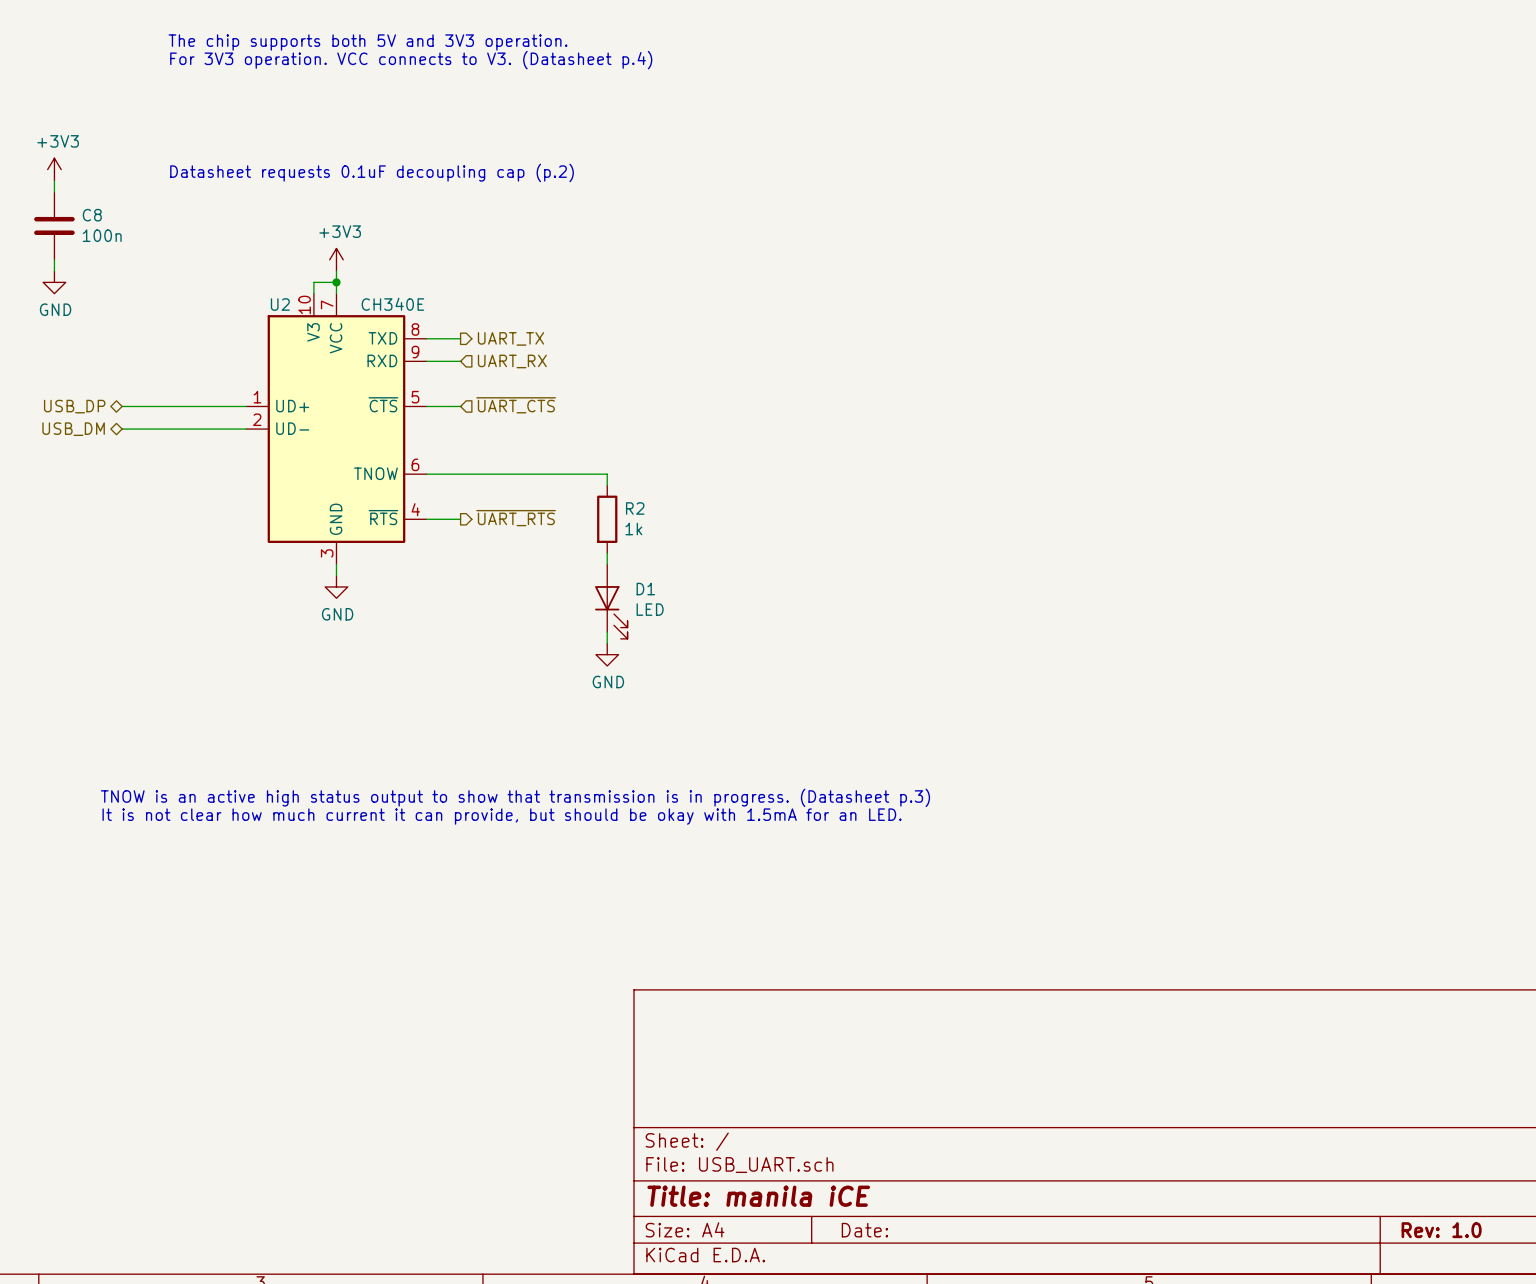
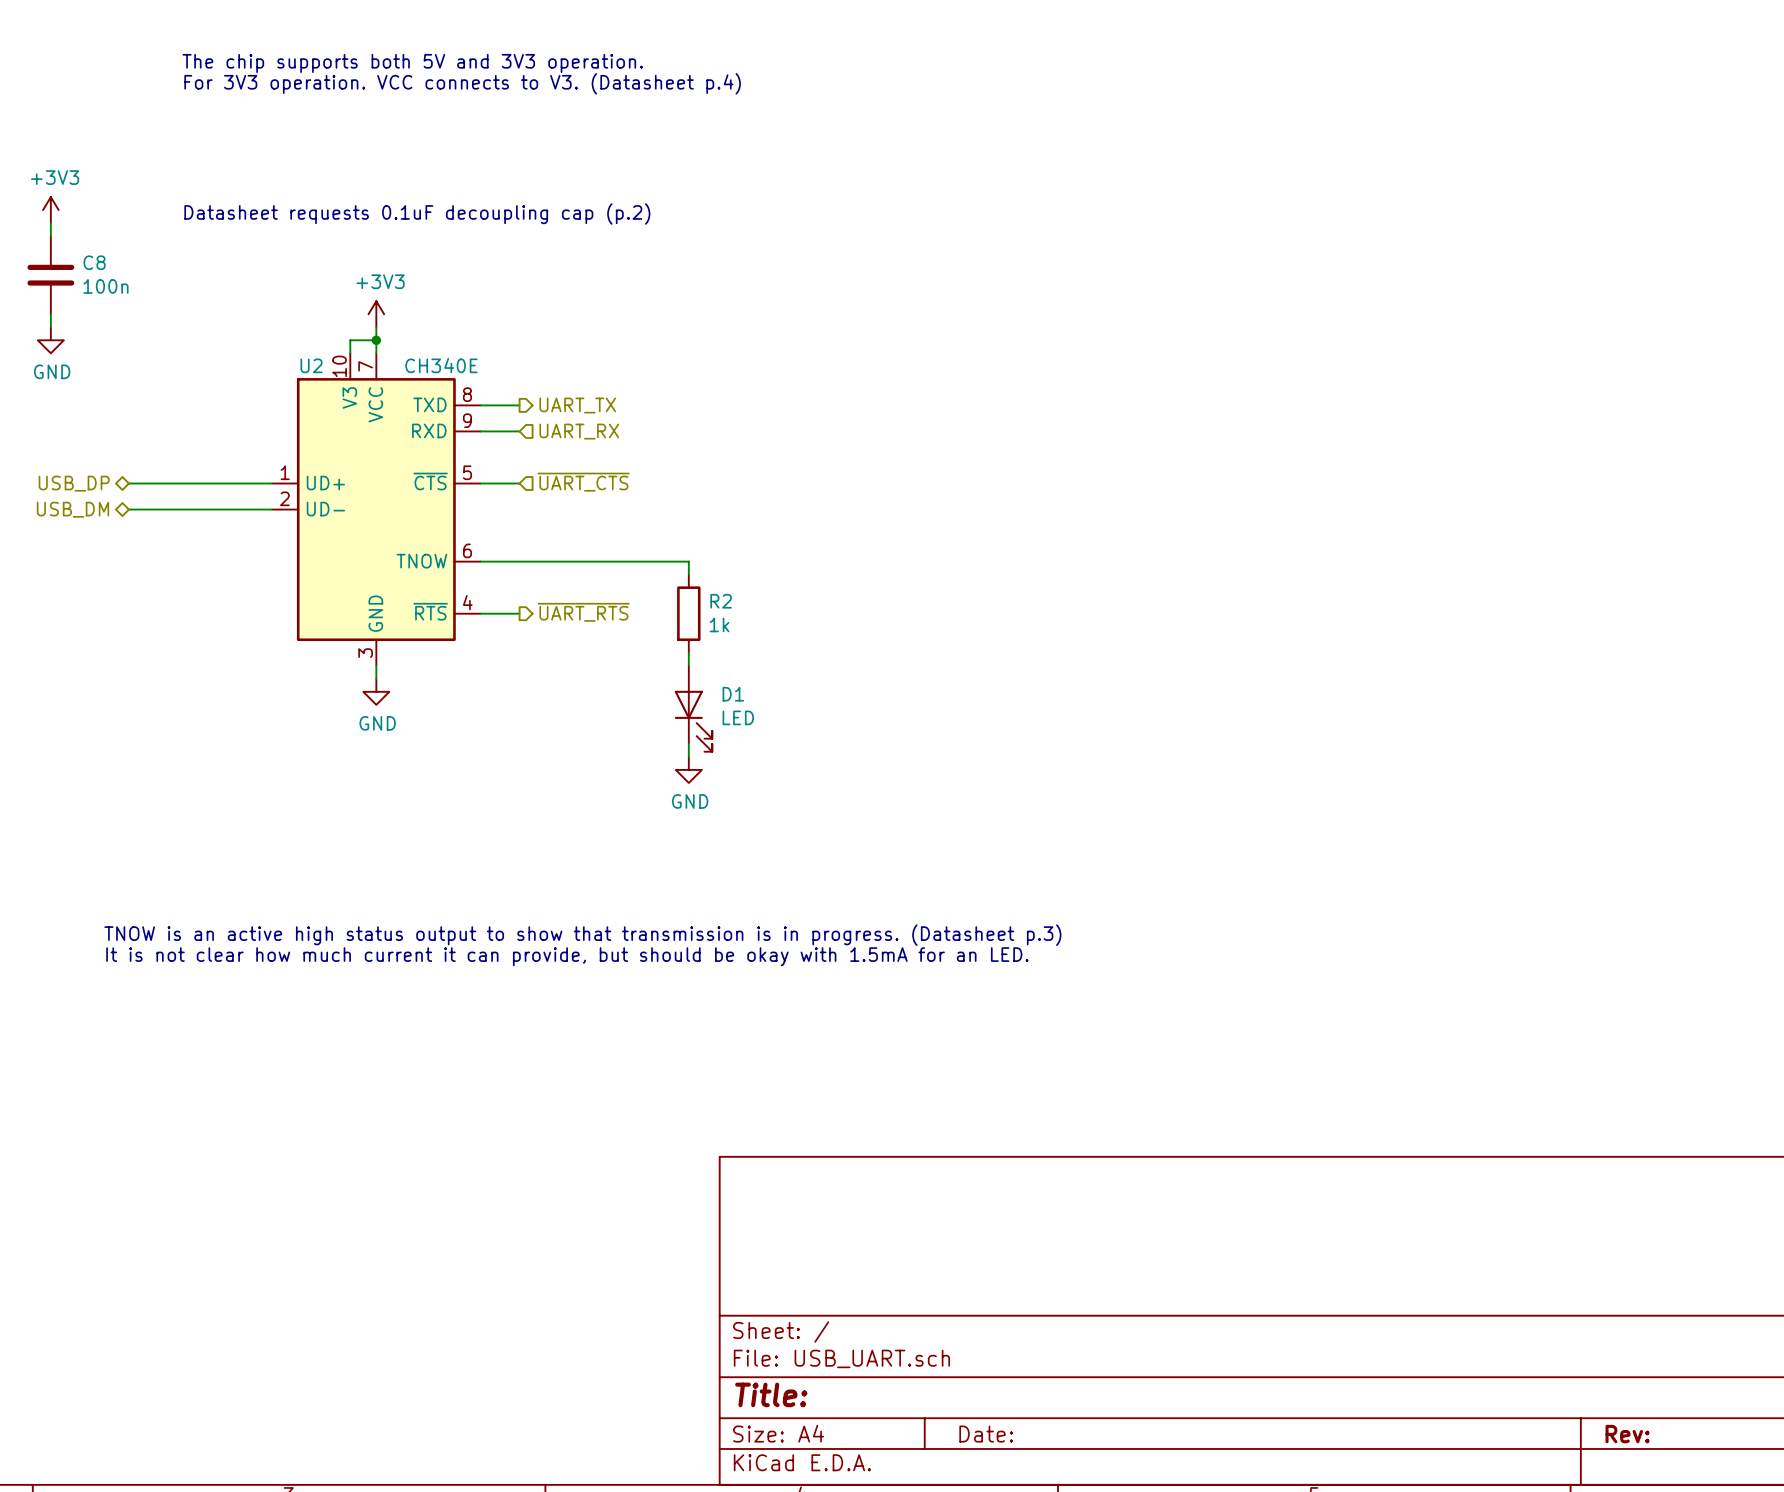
title block: Title: manila iCE (758, 1196) -> Title: (771, 1394)
title block: Rev: 1.0 (1441, 1230) -> Rev: (1627, 1434)

